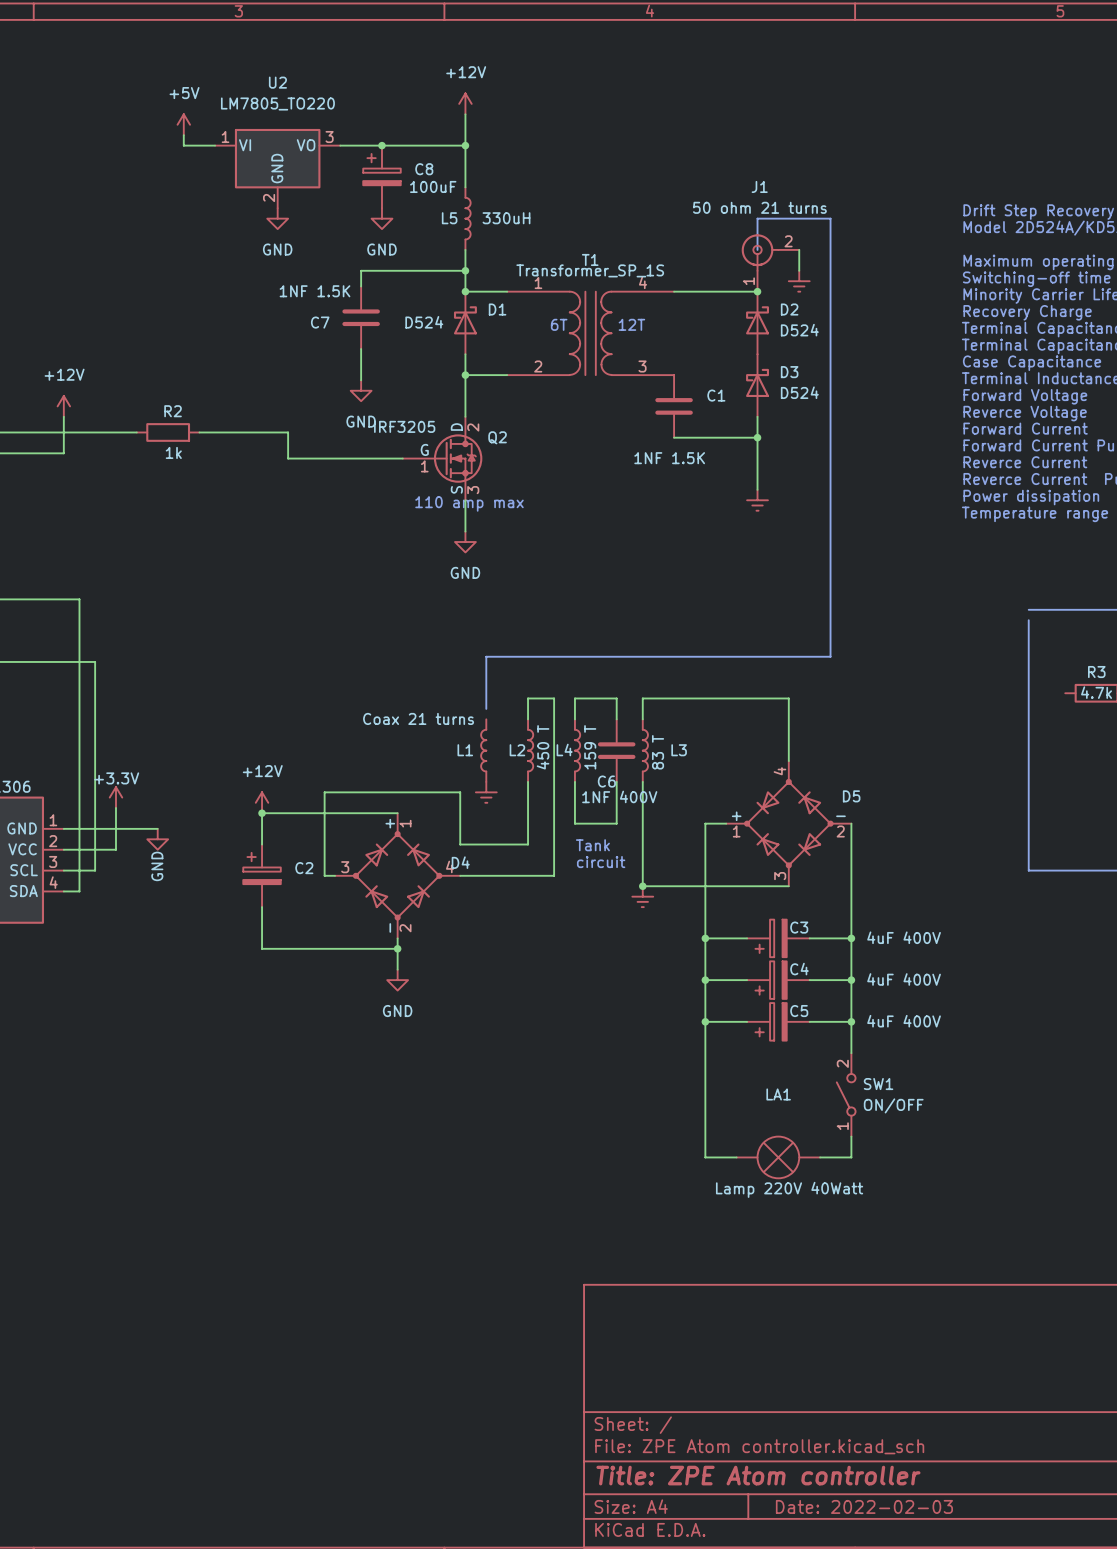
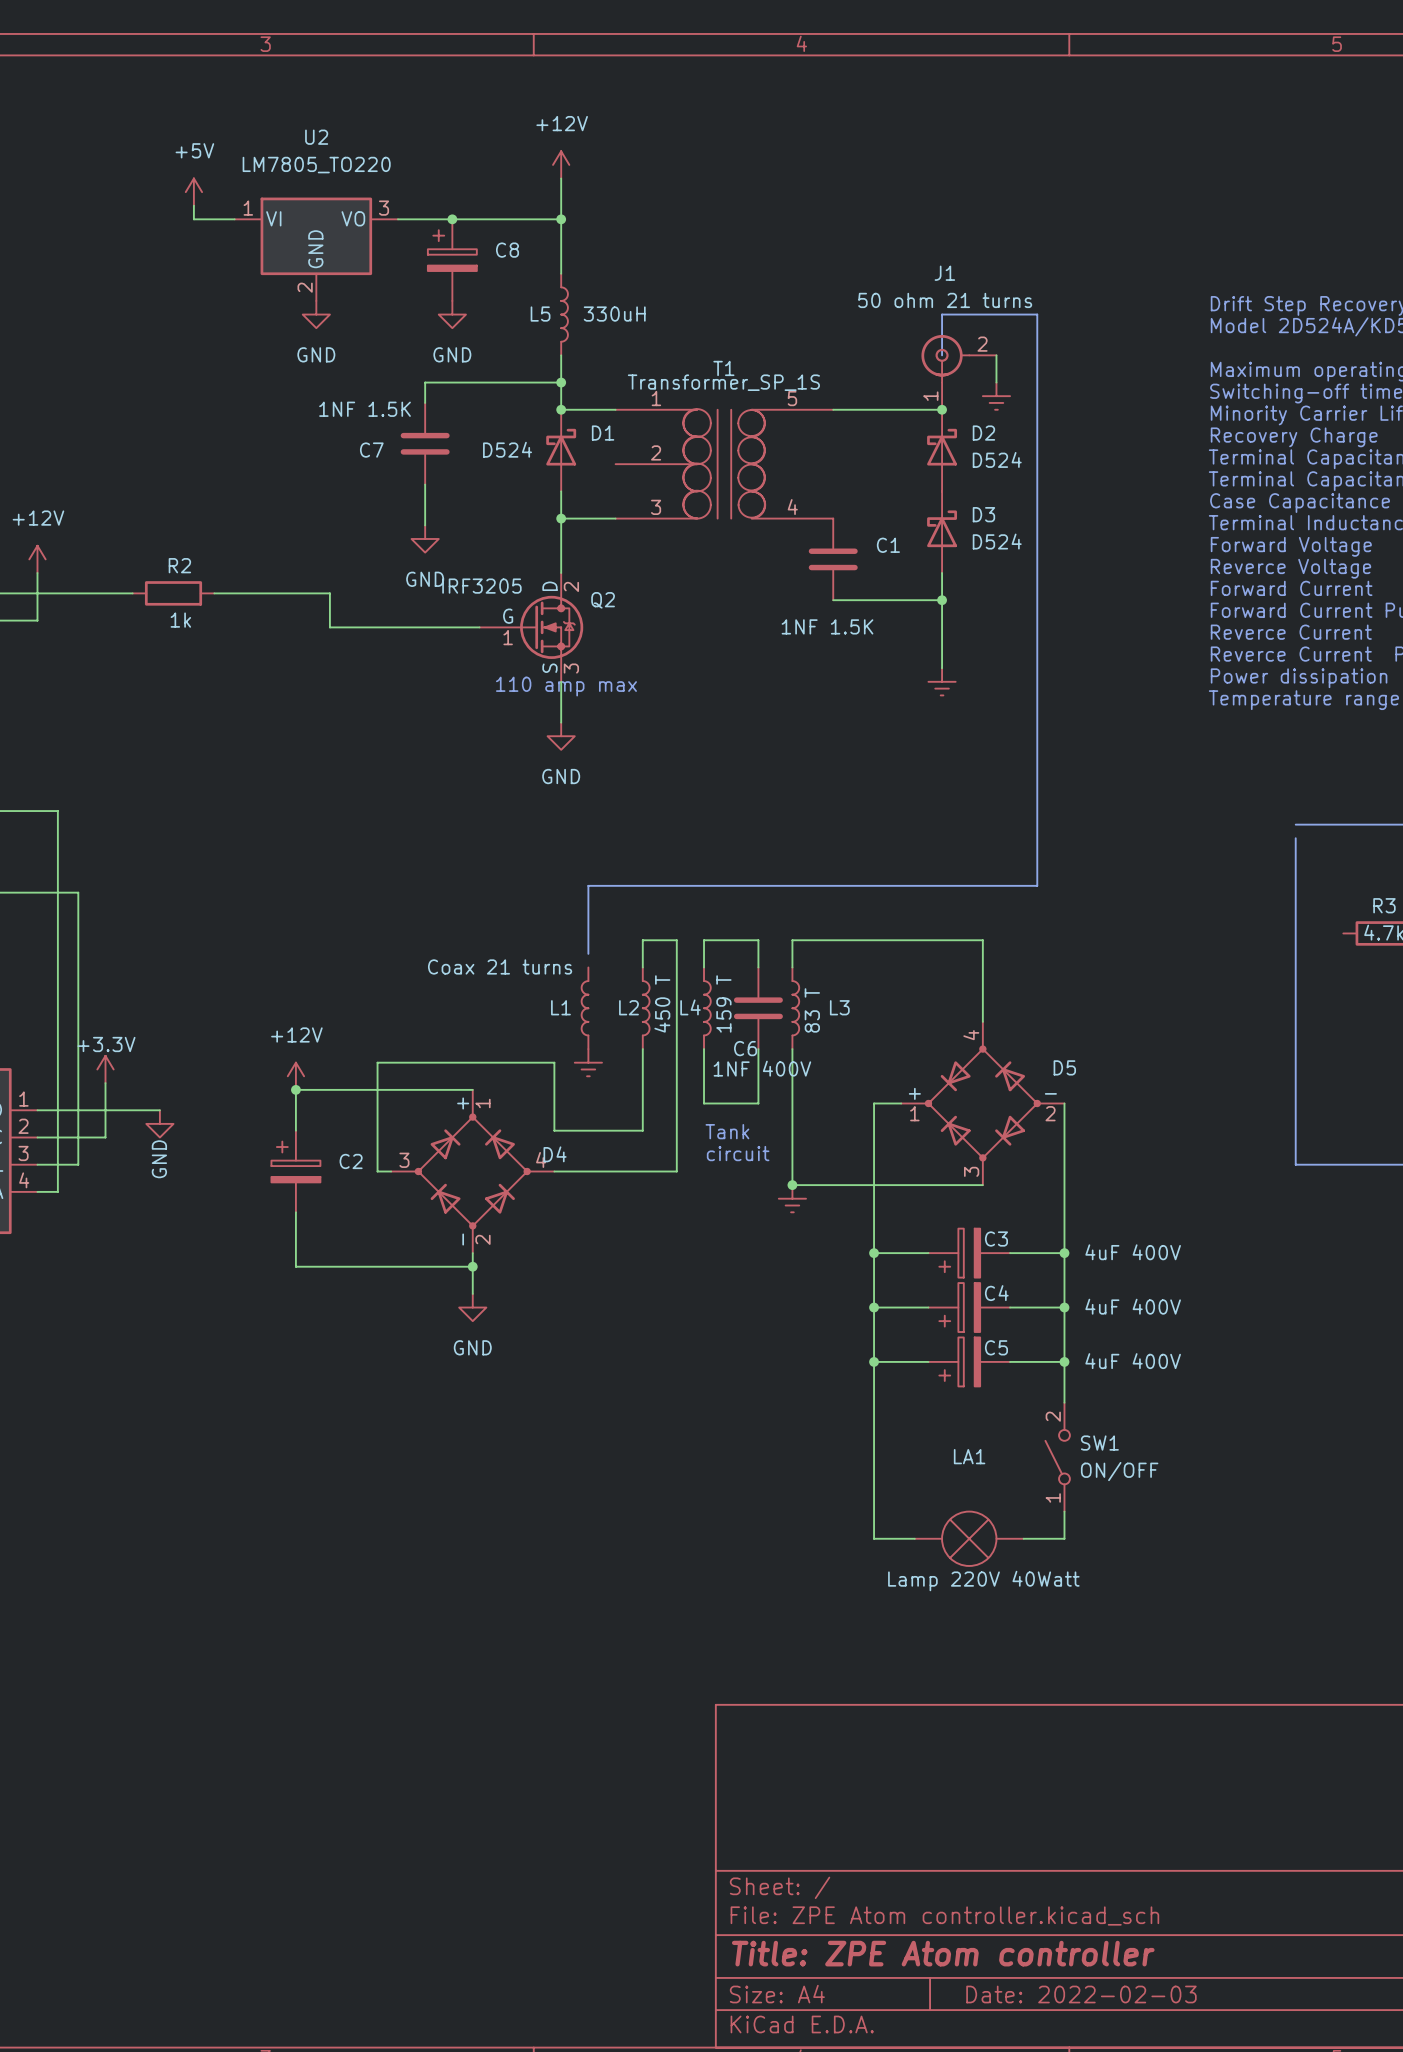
C8 value: 100uF (433, 186) -> none
T1 symbol: [507, 291, 675, 376] -> [615, 409, 834, 519]
text: 6T (559, 324) -> none
text: 12T (631, 324) -> none

